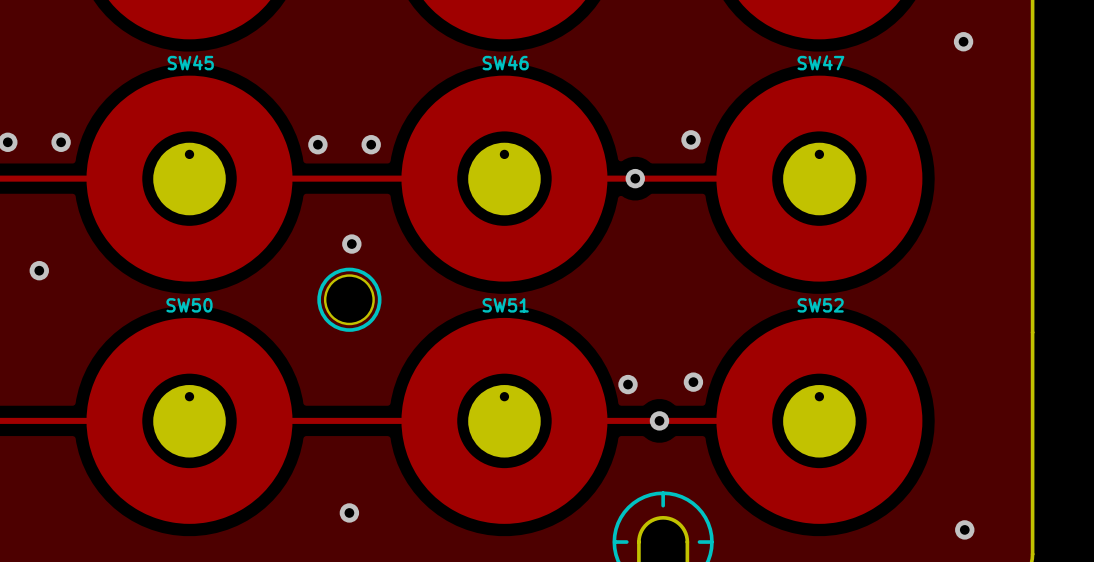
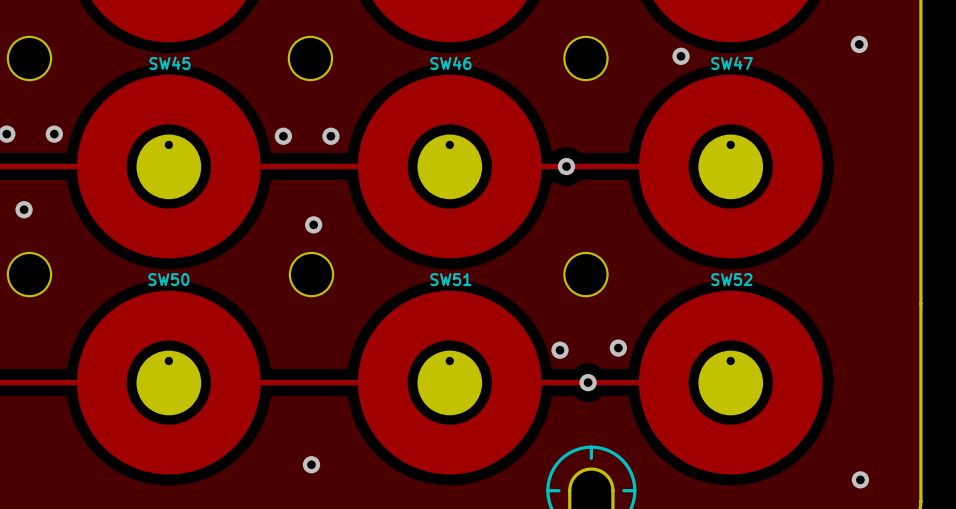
round board edge: none -> [6, 35, 53, 82]
round board edge: none -> [287, 35, 334, 82]
round board edge: none -> [563, 35, 609, 82]
via position: (691, 139) -> (681, 56)
drawing: [317, 267, 382, 332] -> none
via position: (39, 270) -> (24, 209)
round board edge: none -> [6, 251, 53, 298]
round board edge: none -> [563, 251, 609, 298]

